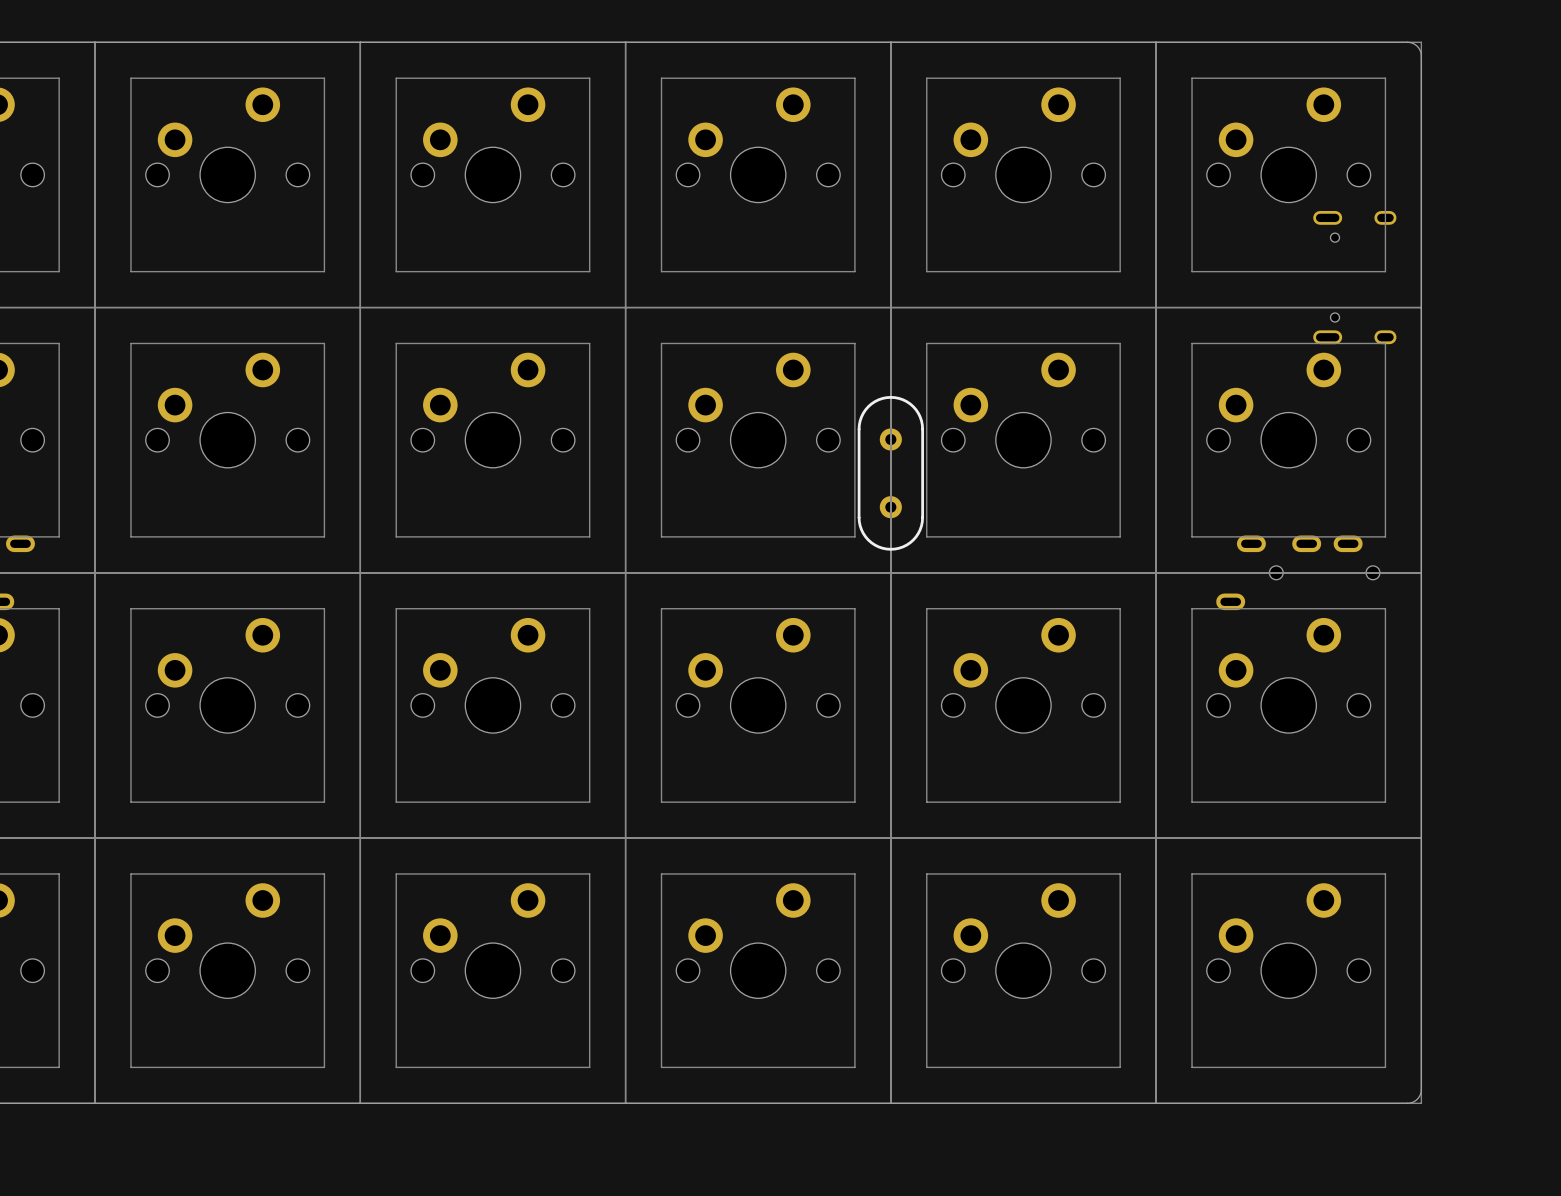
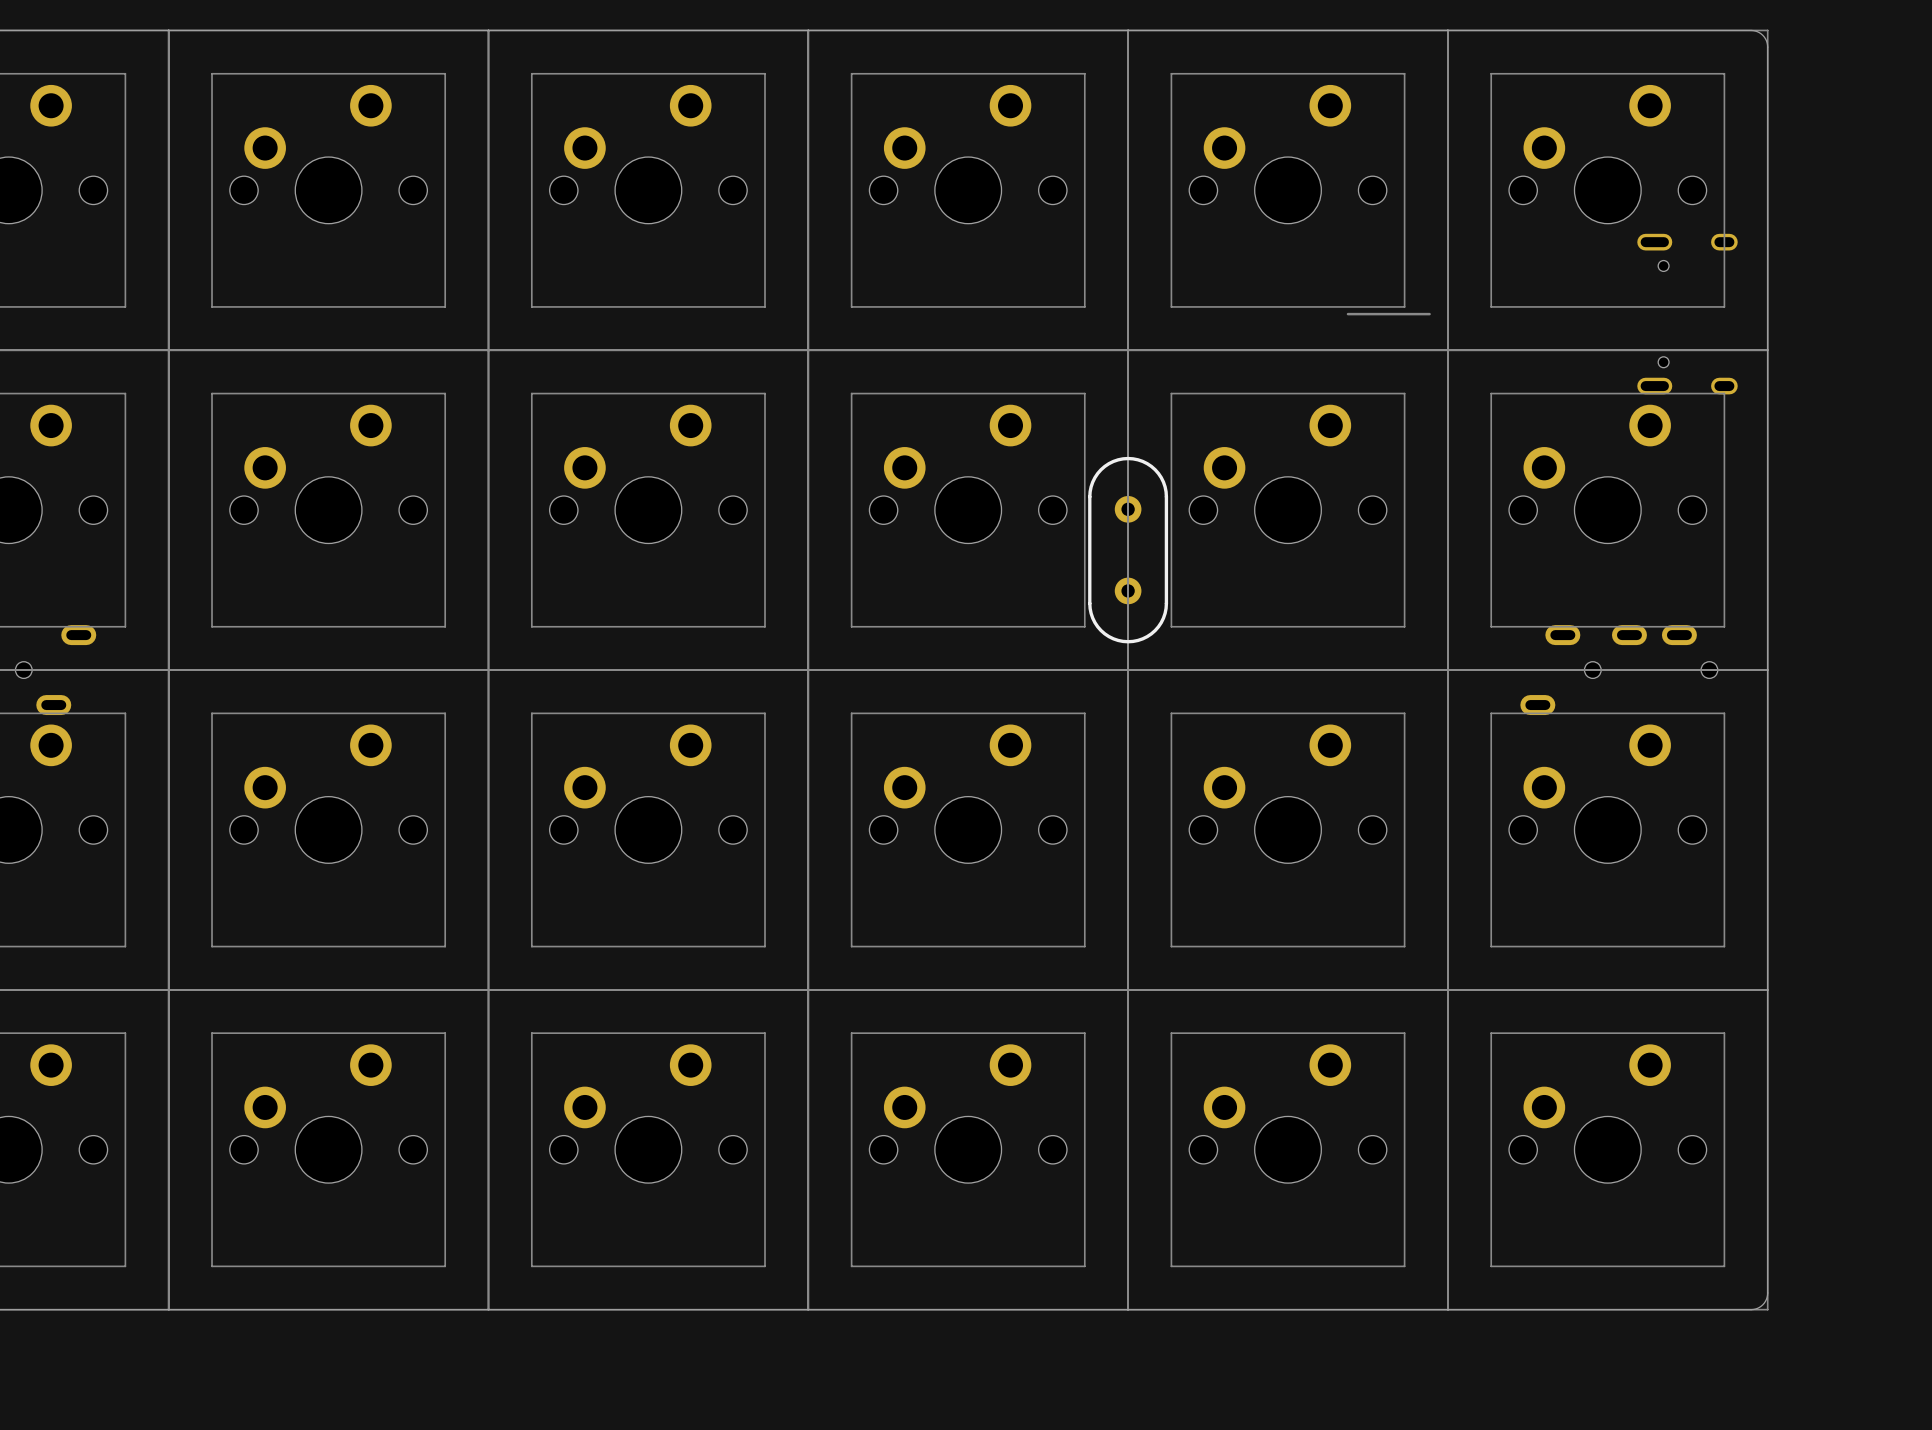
line: none -> (1347, 314) (1429, 314)

